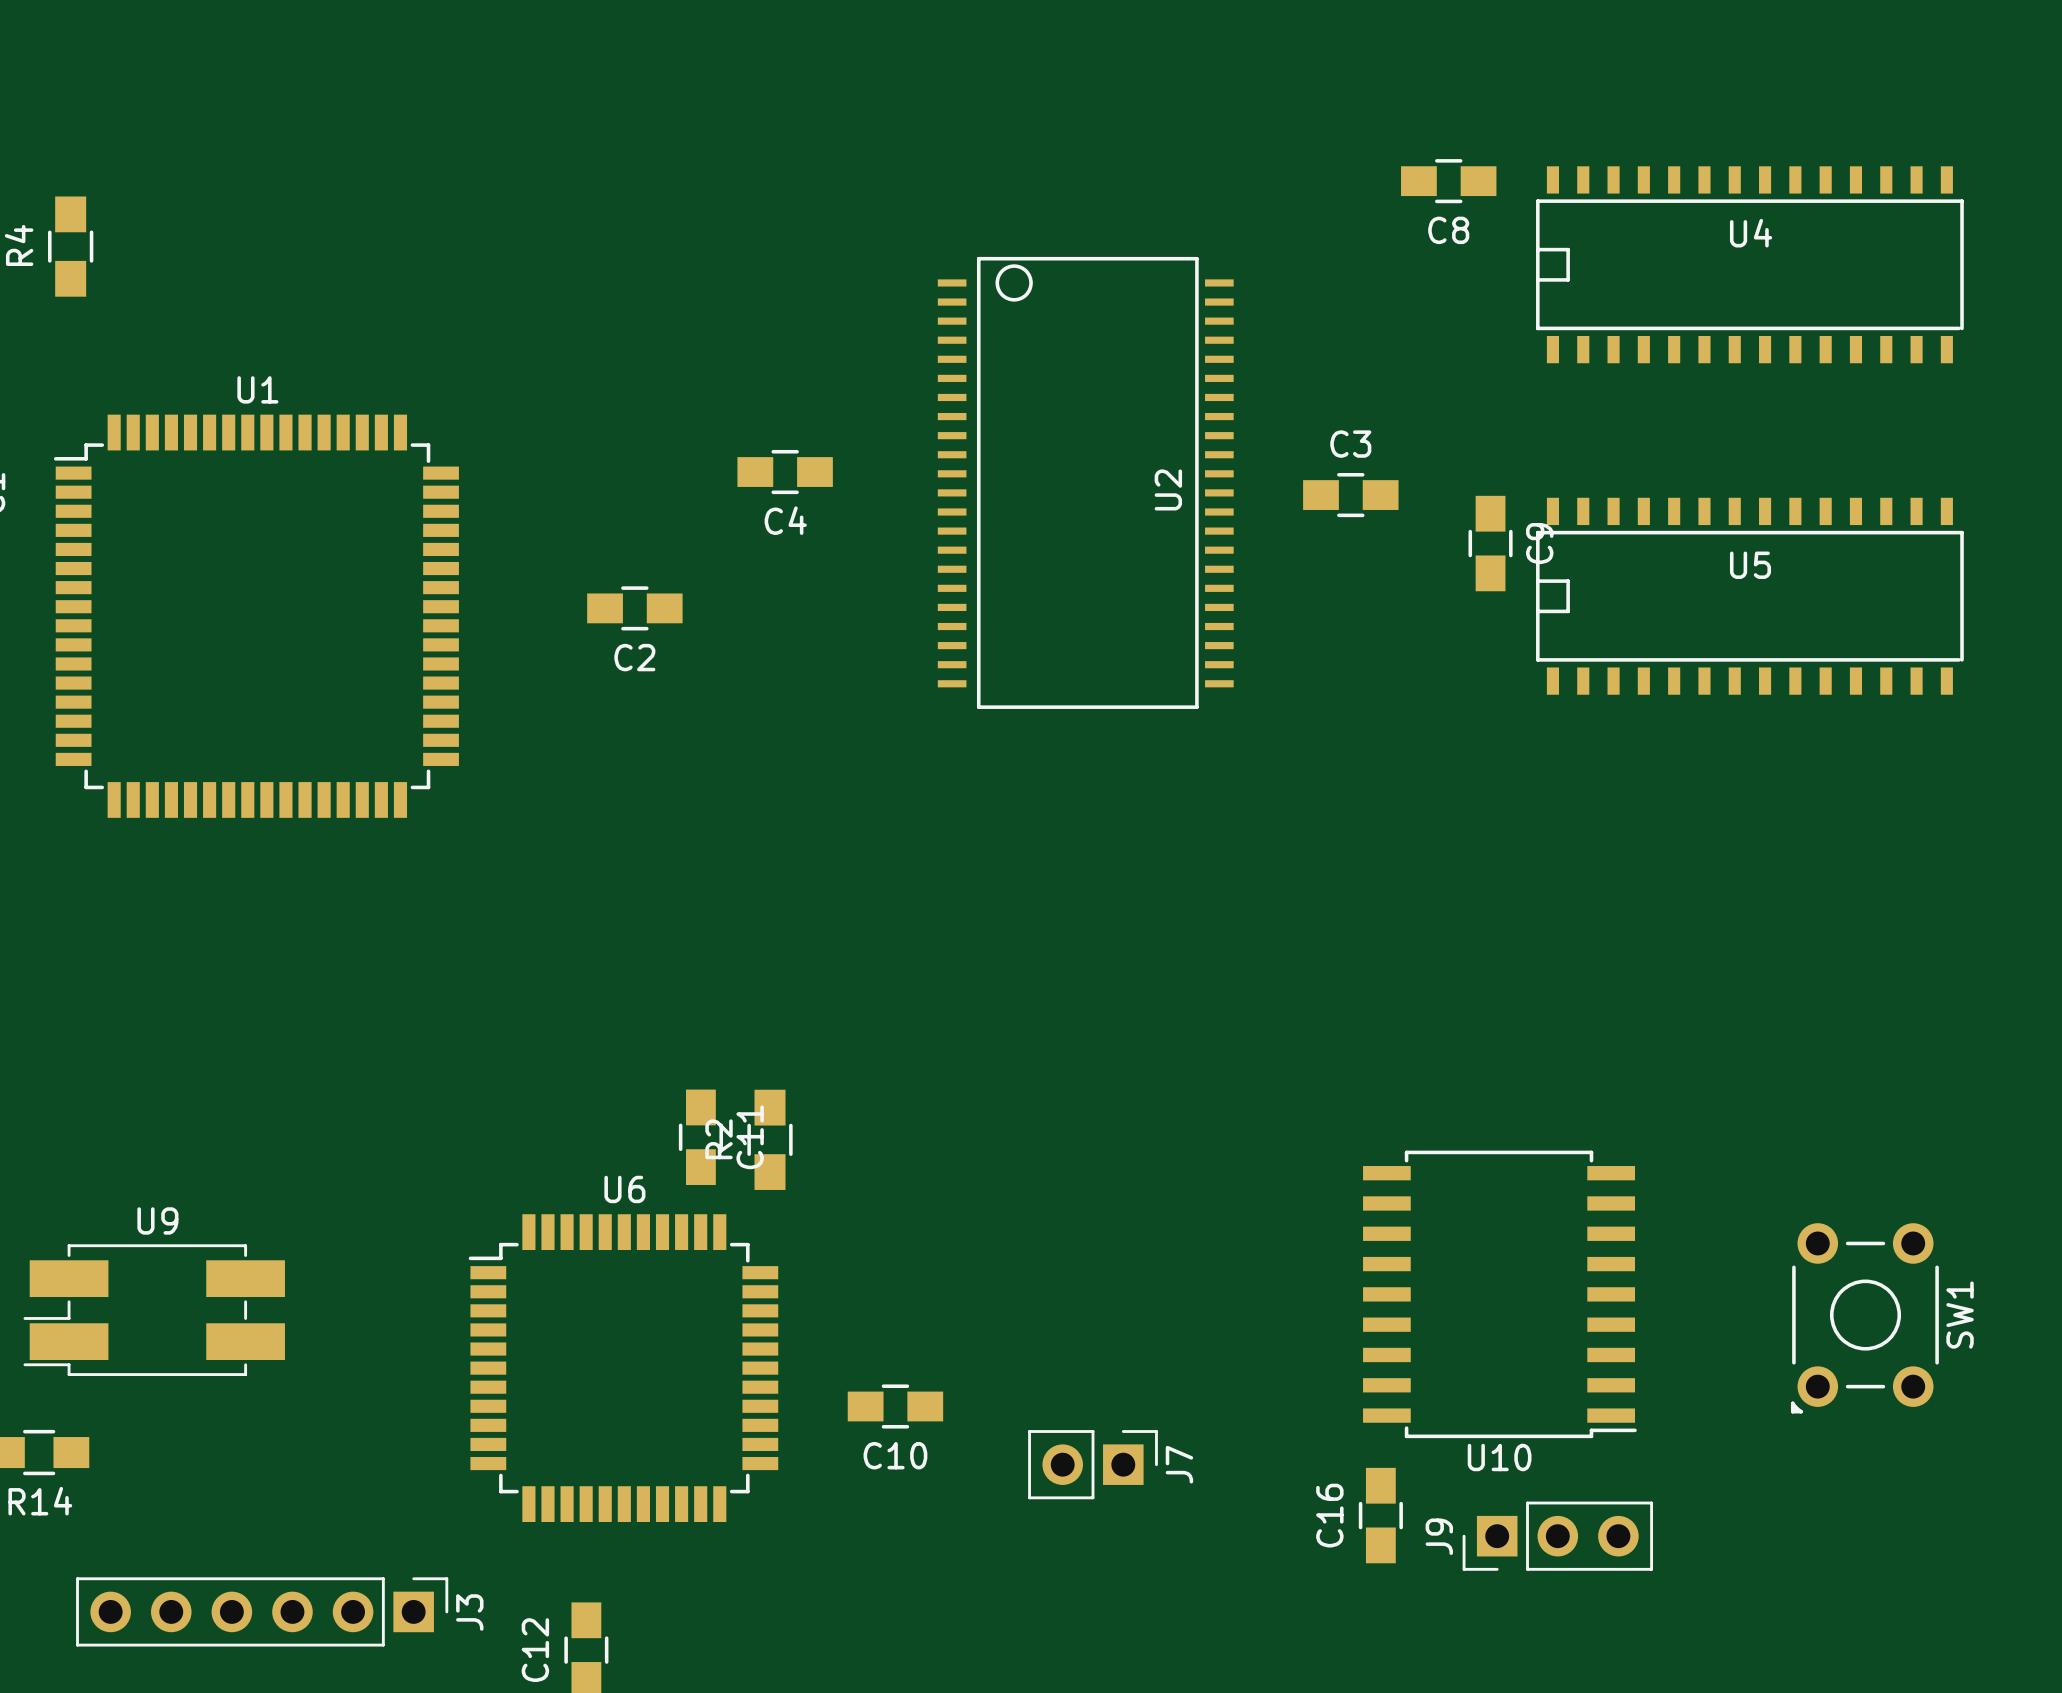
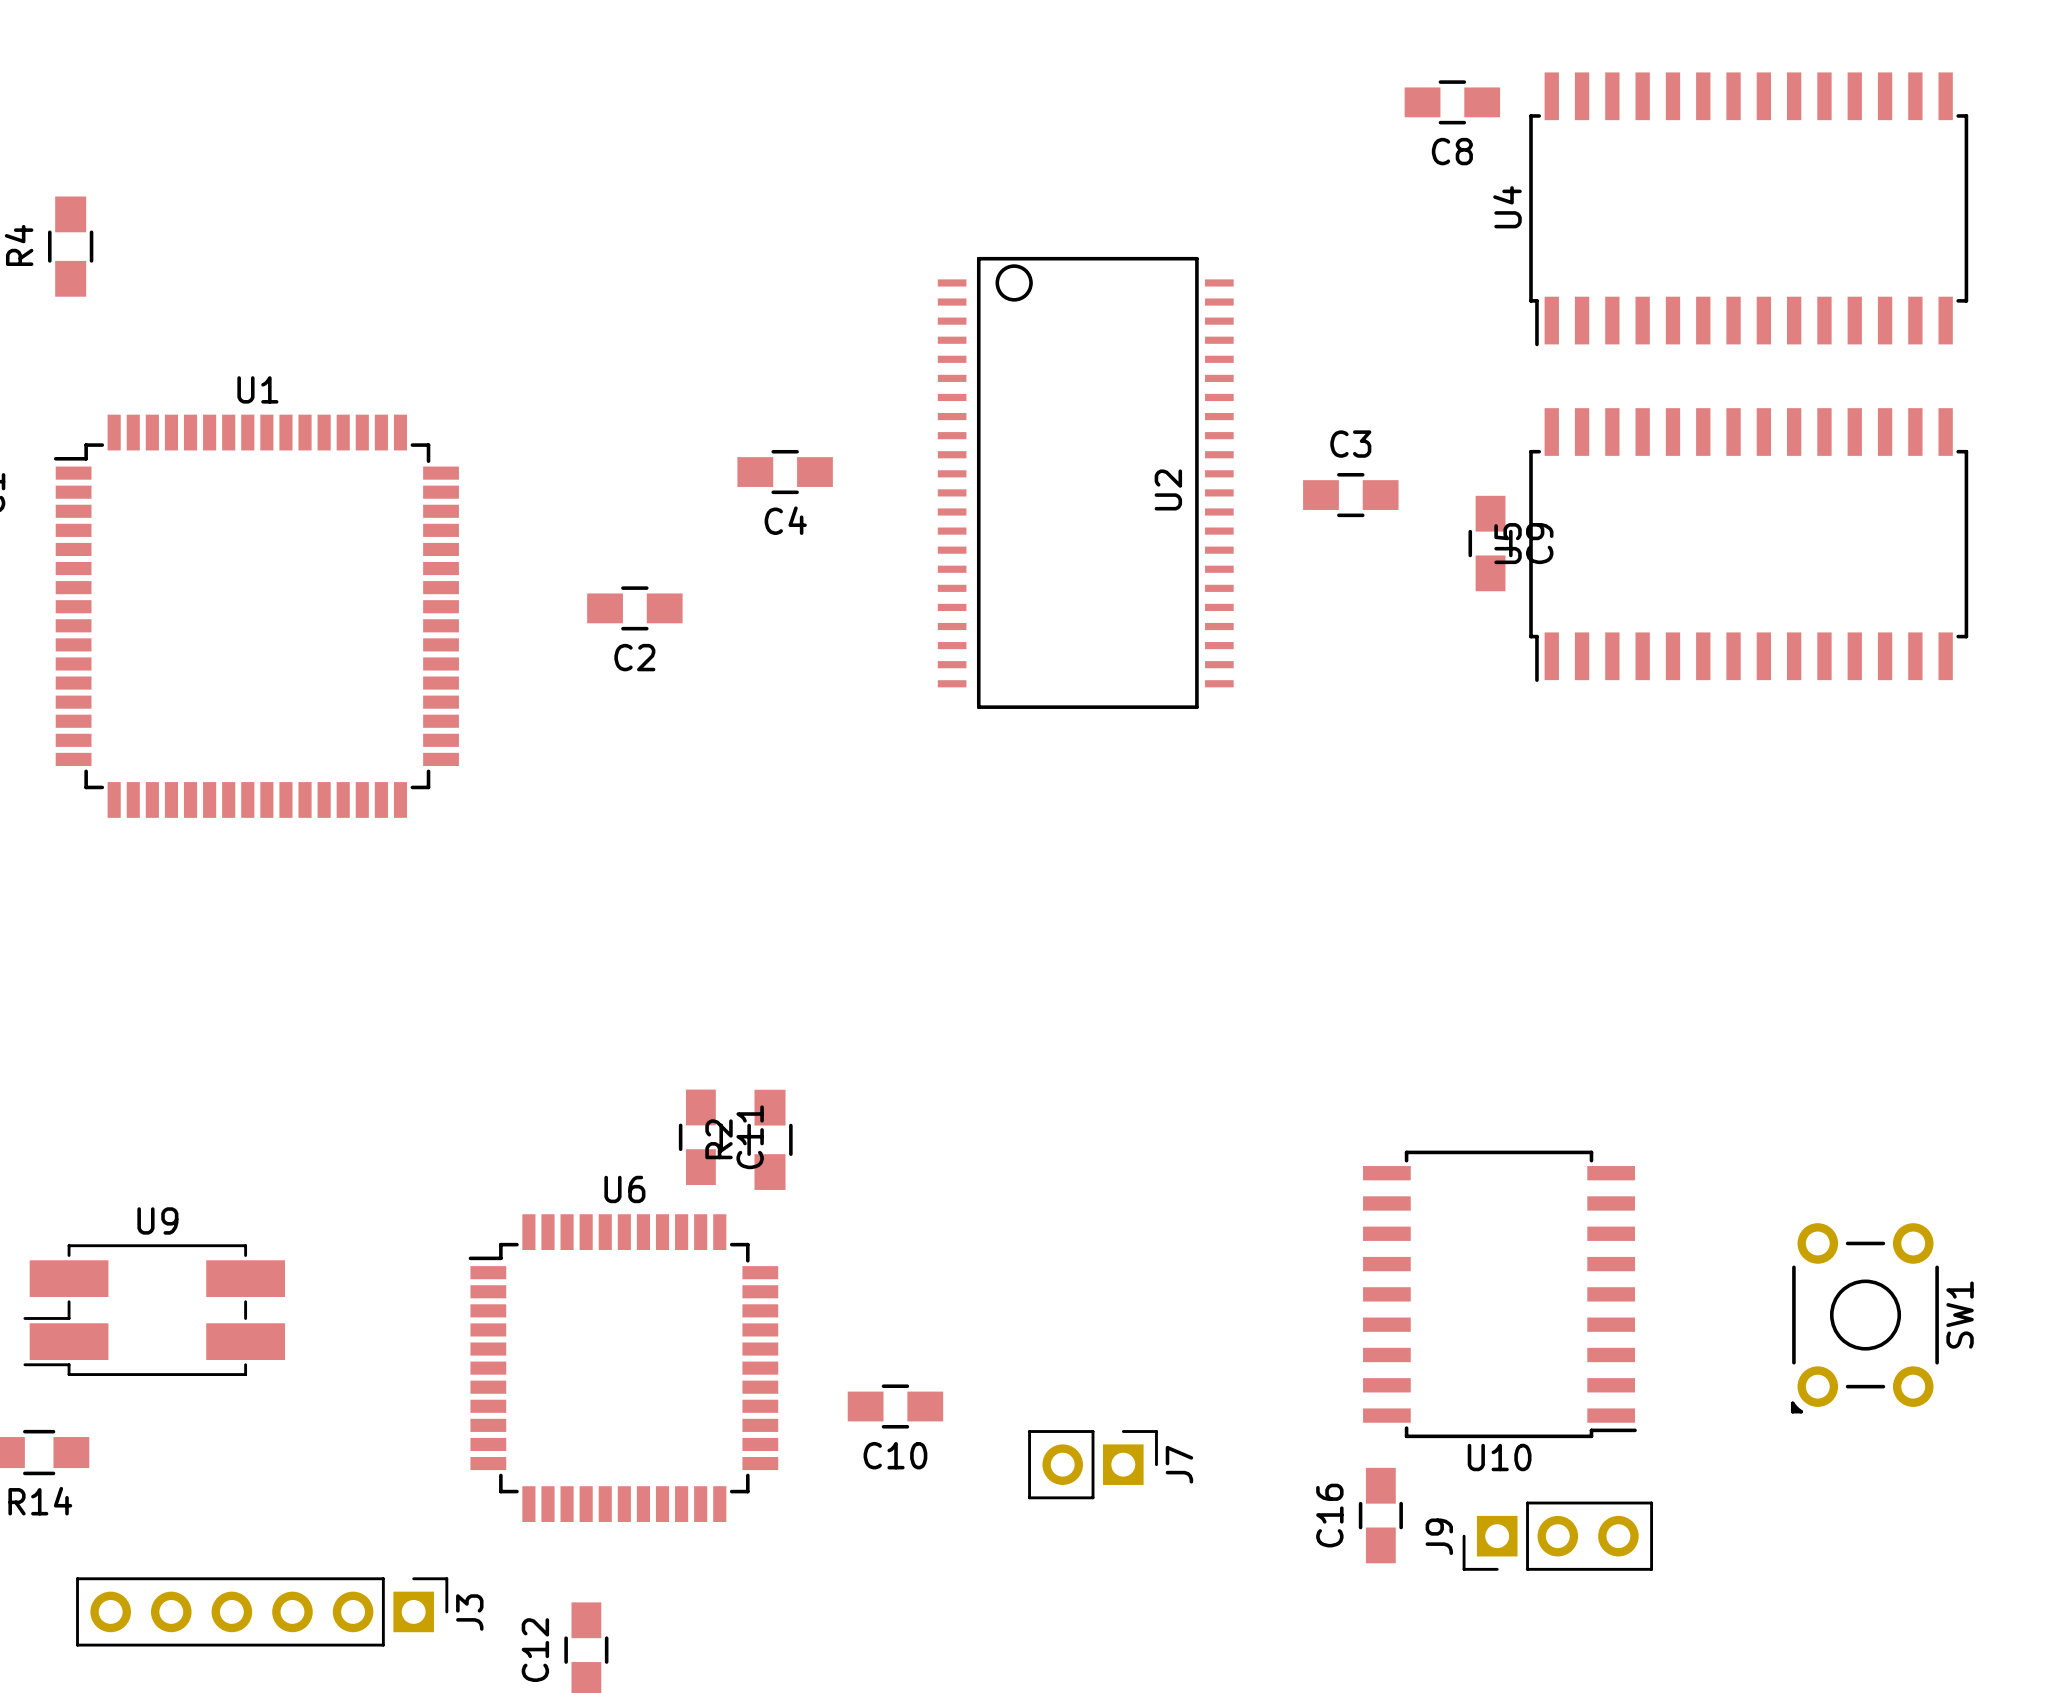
U4 footprint: [1536, 166, 1964, 364] -> [1529, 72, 1969, 347]
C8 position: (1448, 181) -> (1452, 102)
U4 name position: U4 (1751, 233) -> U4 (1507, 207)
U5 footprint: [1536, 497, 1964, 695] -> [1529, 408, 1969, 682]
U5 name position: U5 (1750, 565) -> U5 (1508, 543)

